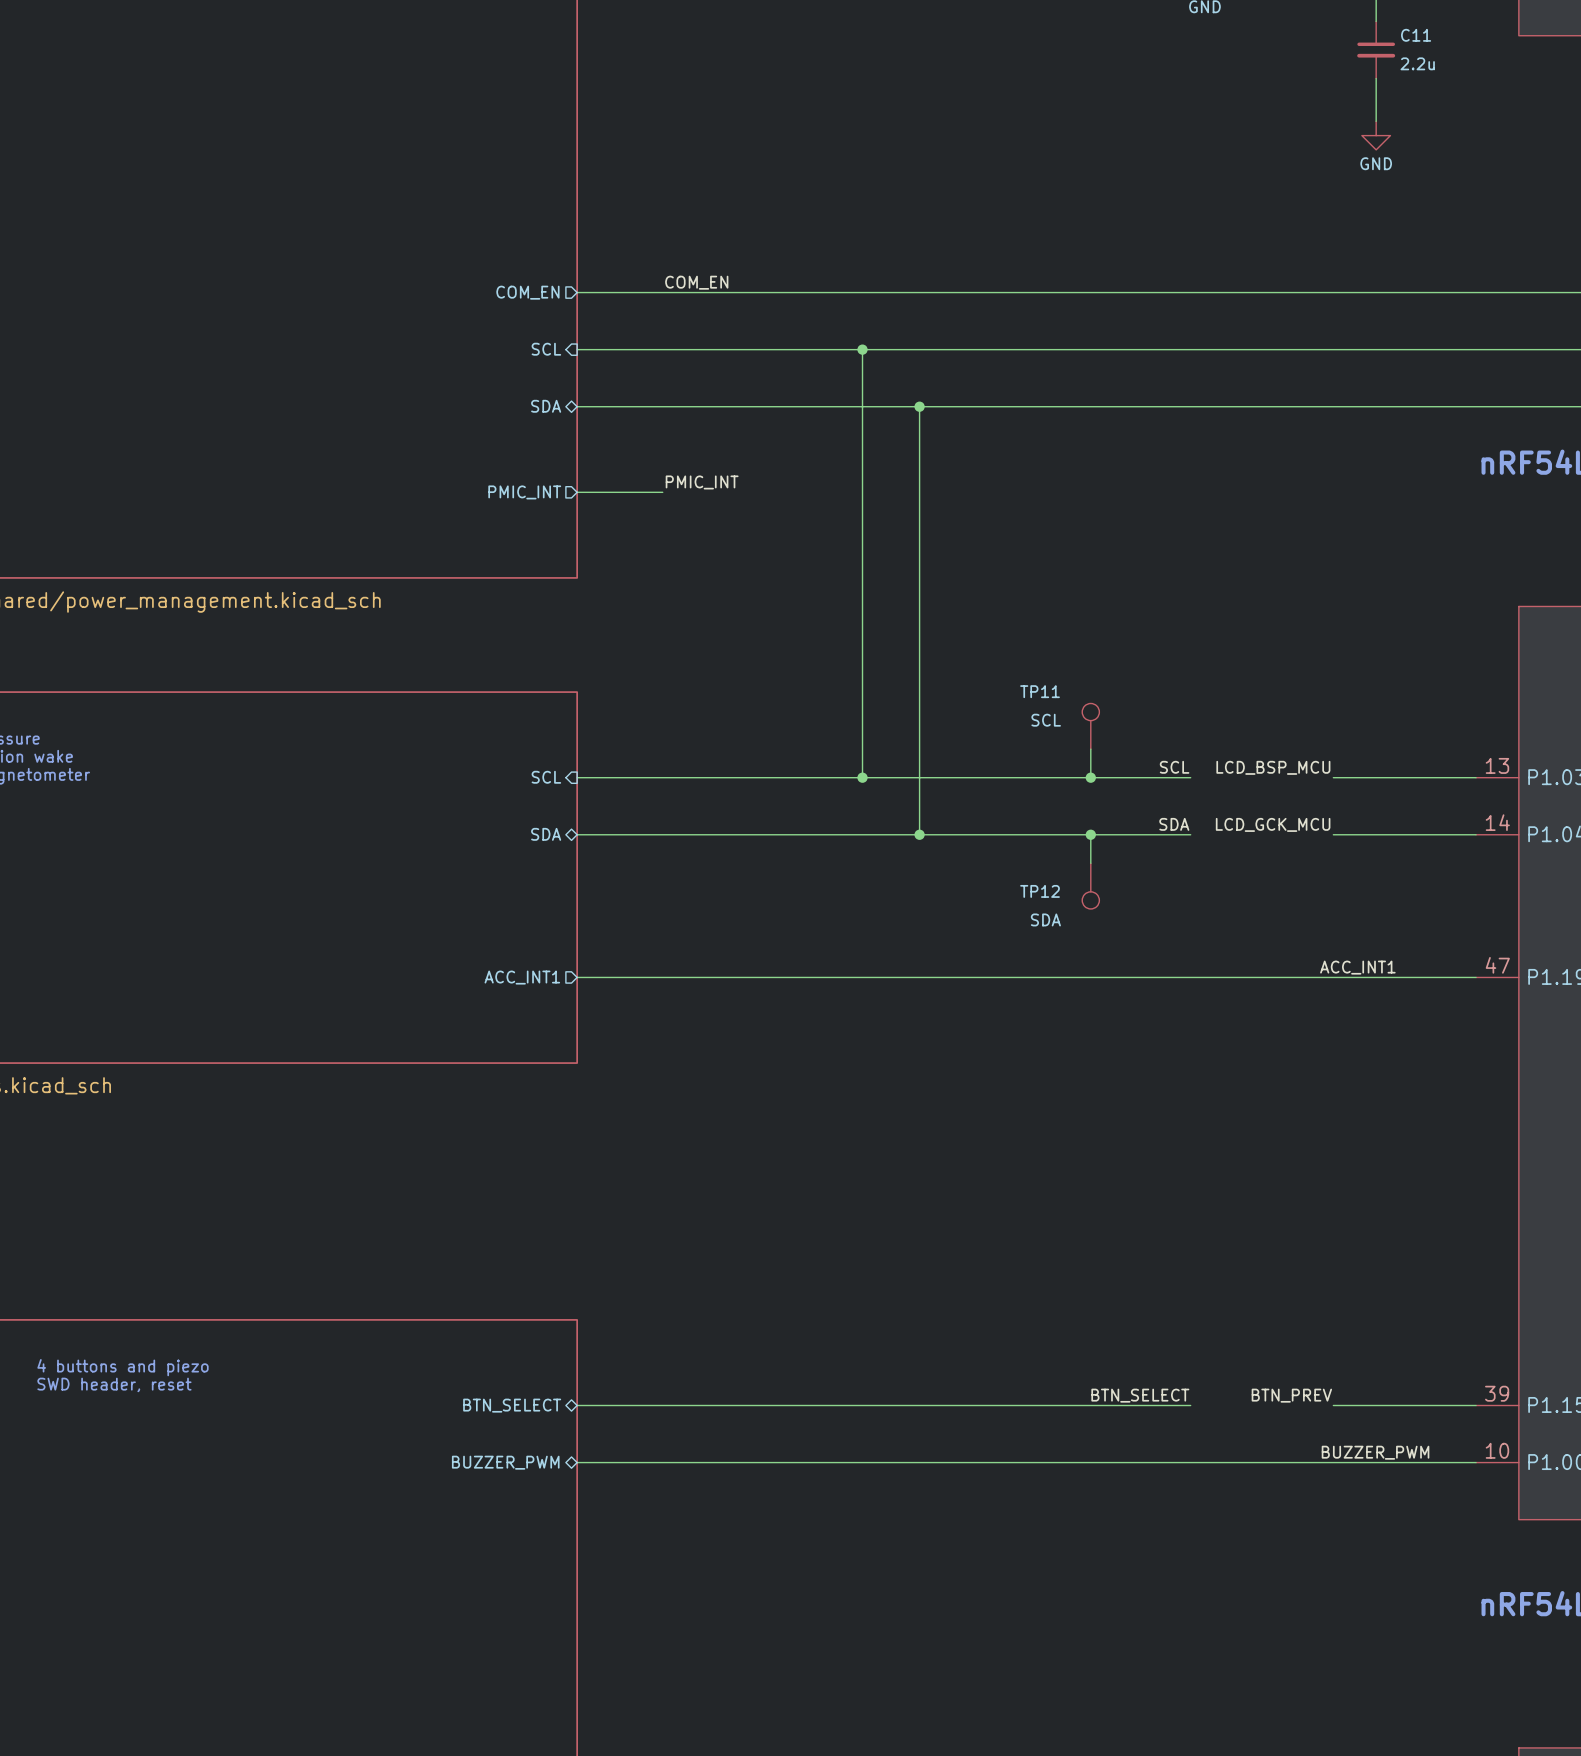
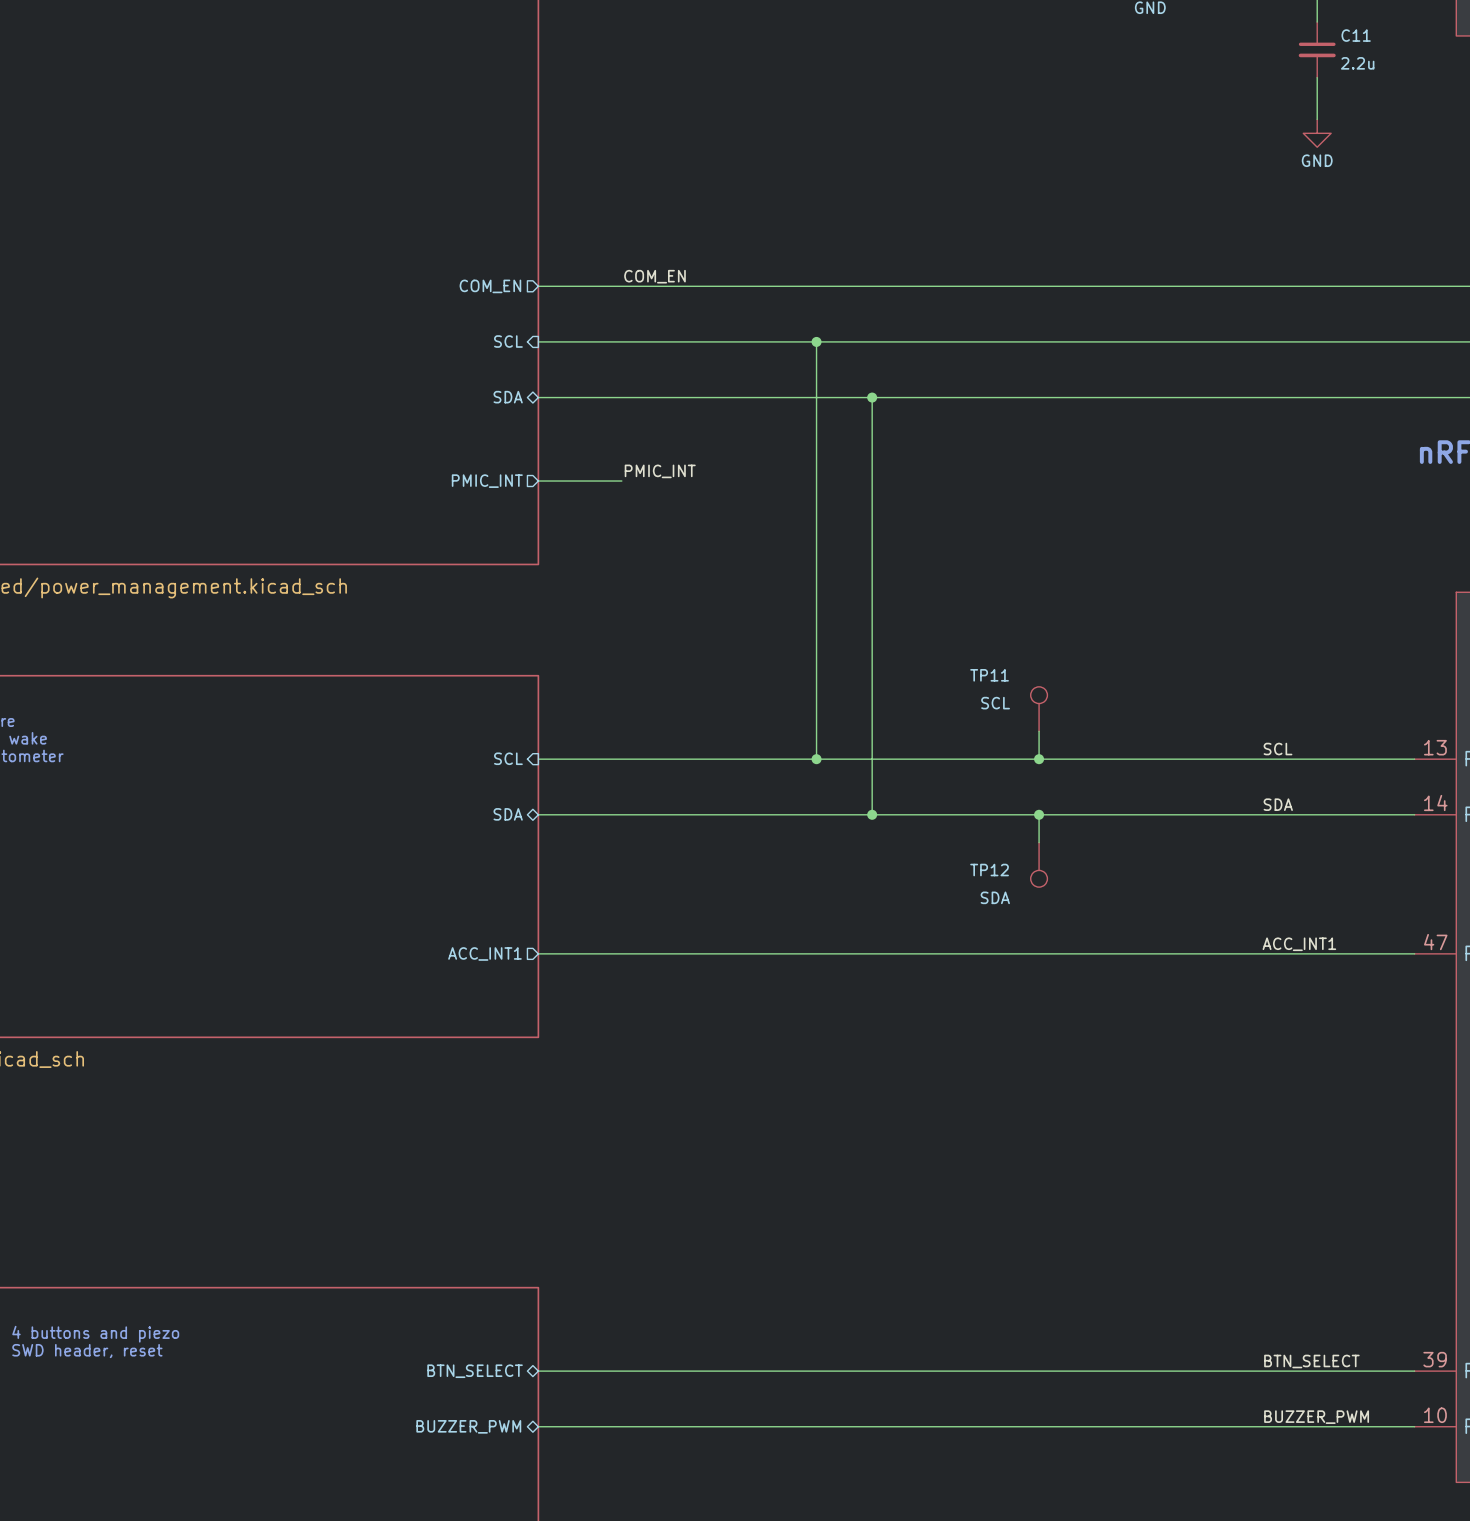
label position: SCL (1174, 767) -> SCL (1278, 749)
label: LCD_BSP_MCU (1273, 767) -> none
wire: none -> (1136, 759) (1275, 759)
label position: SDA (1174, 824) -> SDA (1278, 804)
label: LCD_GCK_MCU (1273, 824) -> none
wire: none -> (1136, 814) (1275, 814)
label position: BTN_SELECT (1140, 1395) -> BTN_SELECT (1311, 1361)
label: BTN_PREV (1291, 1395) -> none
wire: none -> (1136, 1371) (1275, 1371)

